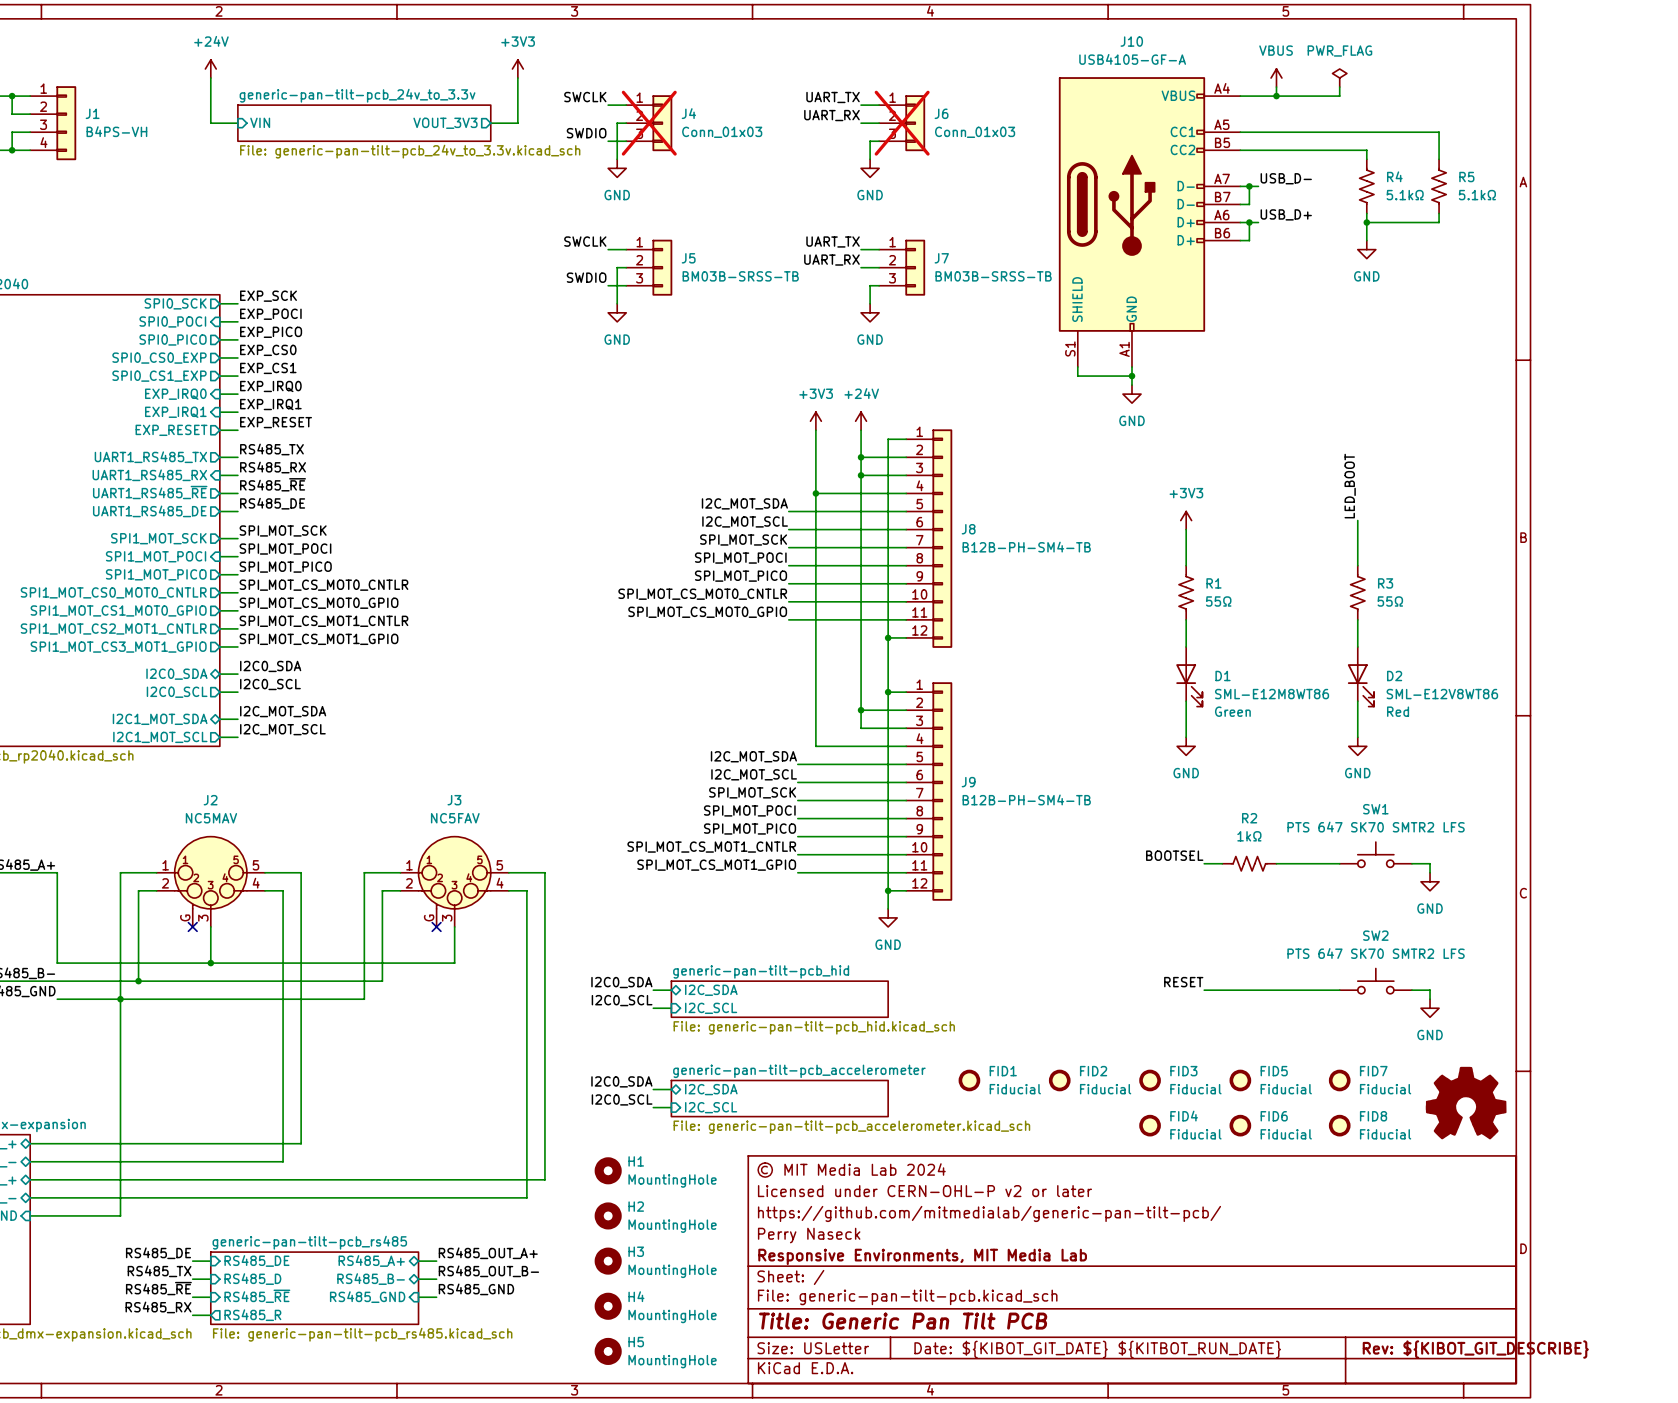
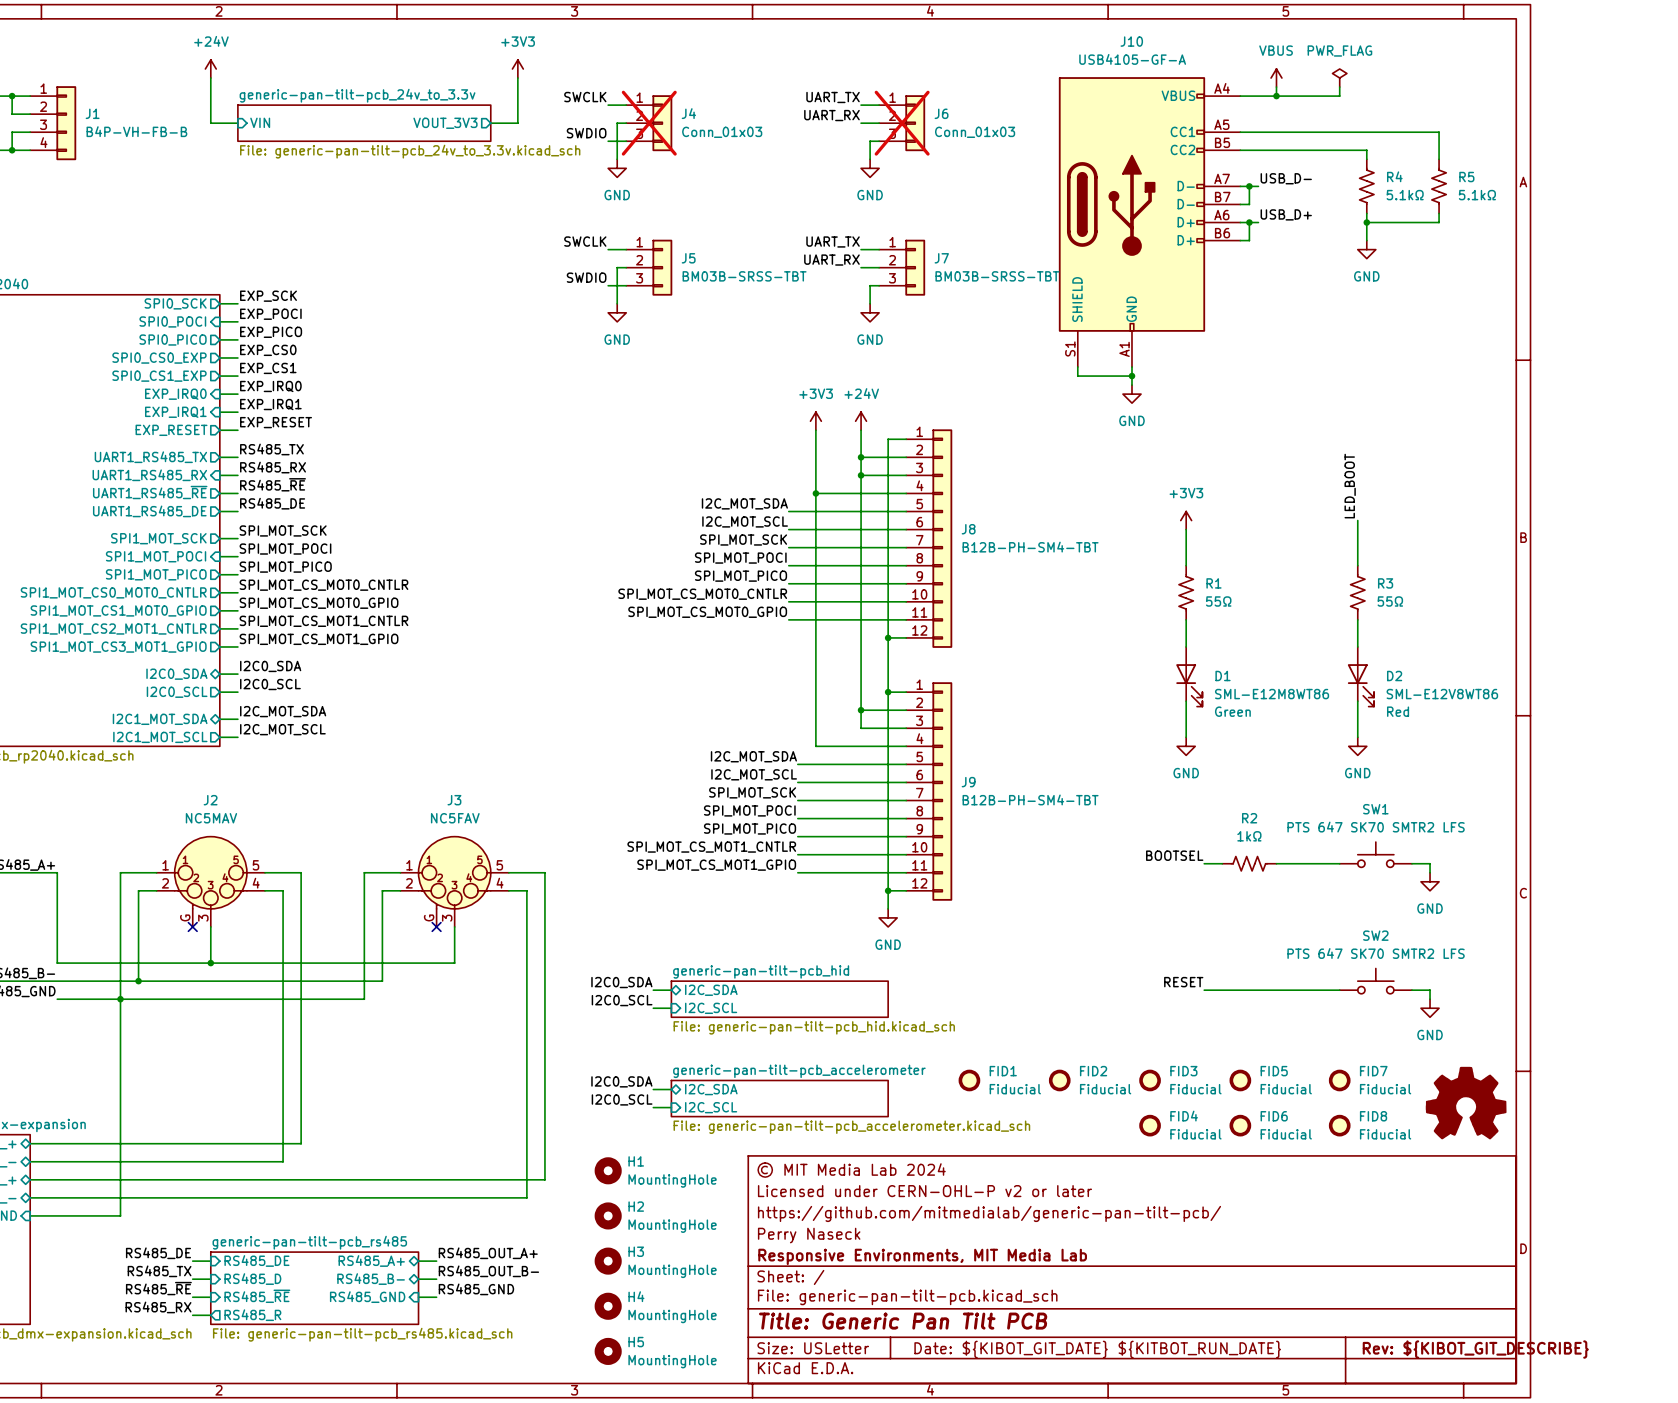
J1 value: B4PS-VH (116, 131) -> B4P-VH-FB-B (136, 131)
J5 value: BM03B-SRSS-TB (740, 276) -> BM03B-SRSS-TBT (744, 276)
J7 value: BM03B-SRSS-TB (993, 276) -> BM03B-SRSS-TBT (997, 276)
J8 value: B12B-PH-SM4-TB (1026, 547) -> B12B-PH-SM4-TBT (1030, 547)
J9 value: B12B-PH-SM4-TB (1026, 799) -> B12B-PH-SM4-TBT (1030, 799)

